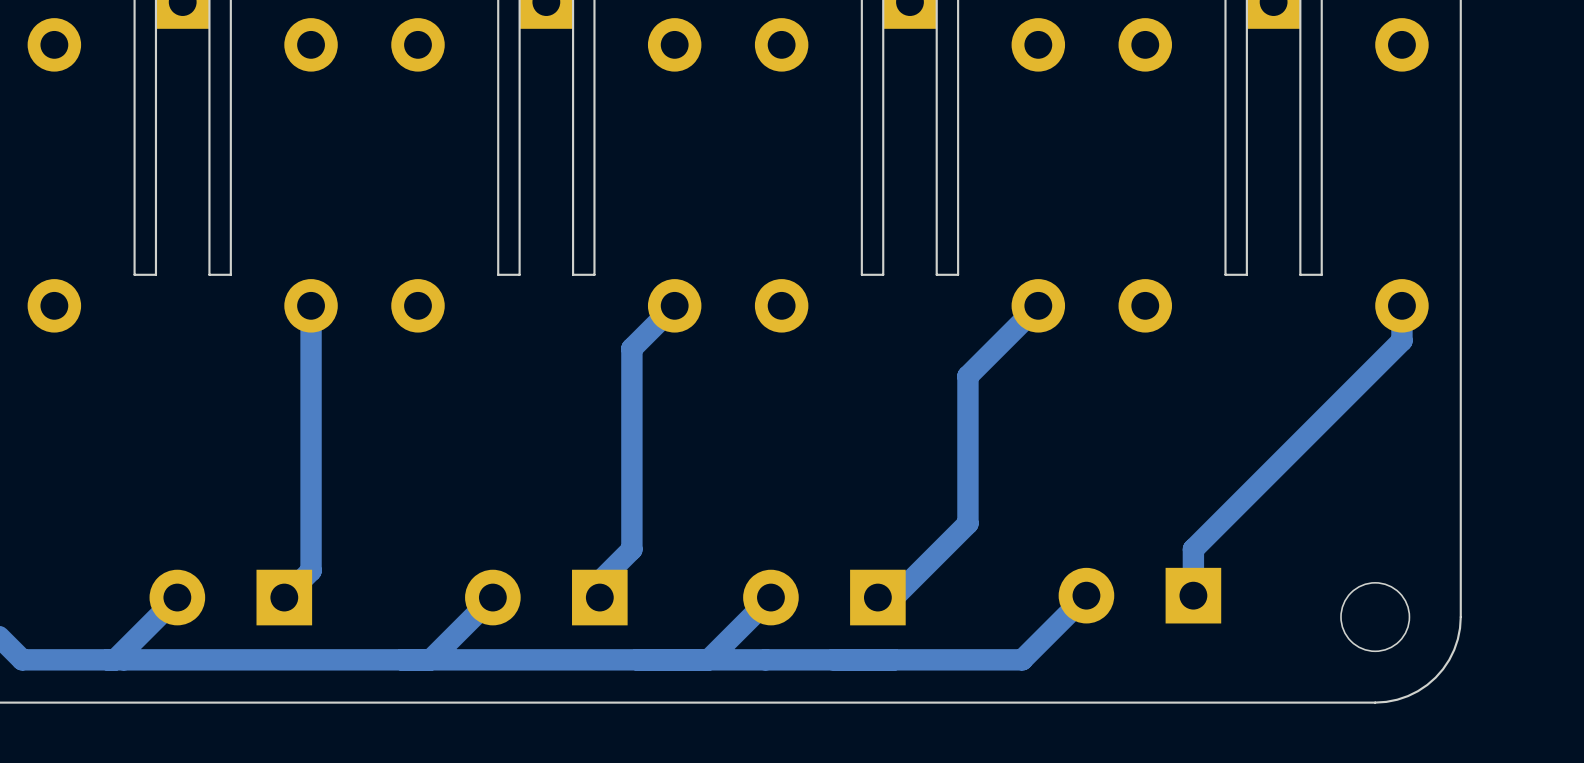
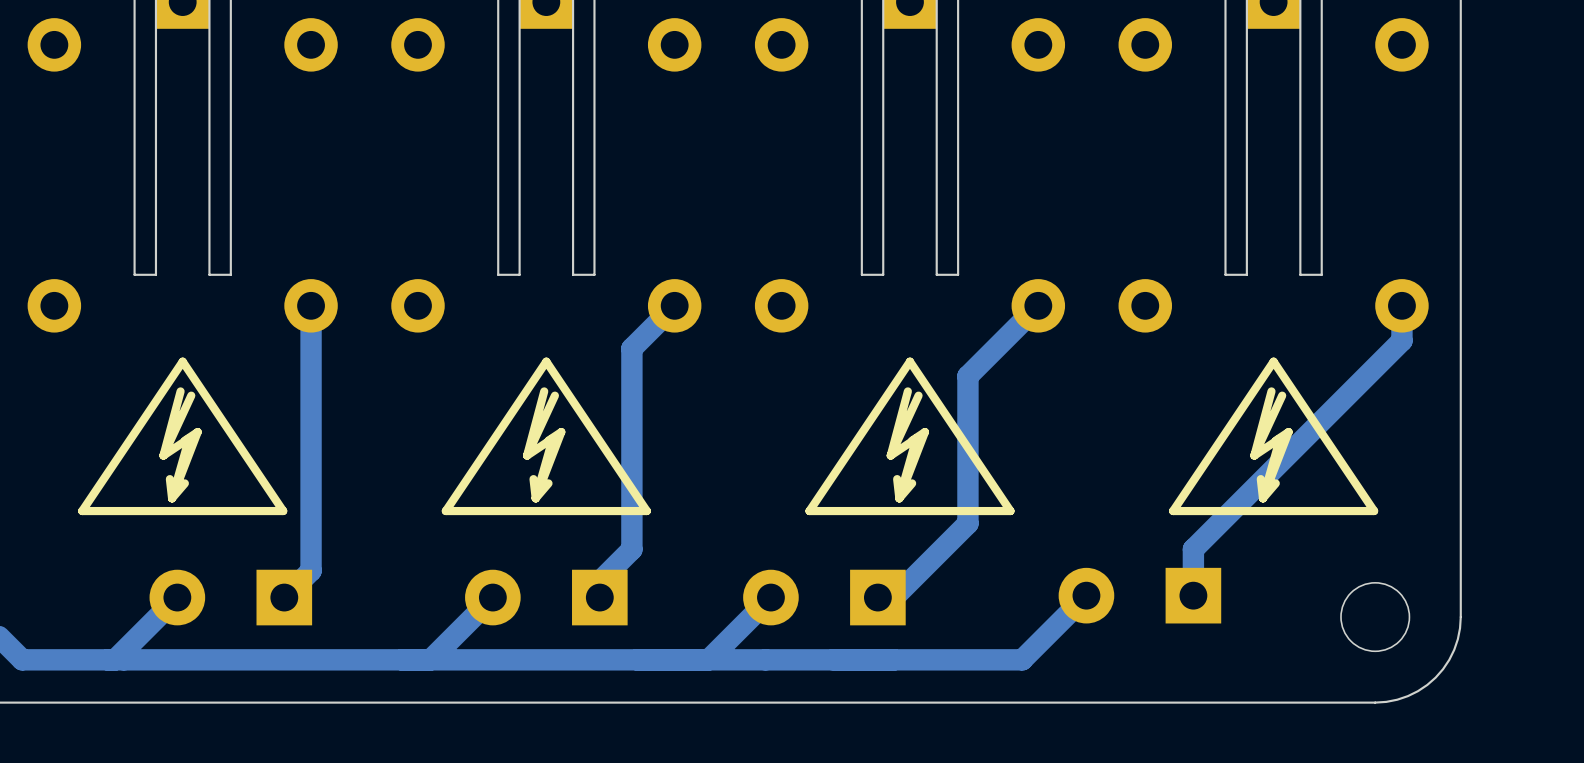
drawing: none -> [78, 357, 288, 516]
drawing: none -> [441, 357, 651, 516]
drawing: none -> [805, 357, 1015, 516]
drawing: none -> [1169, 357, 1379, 516]

